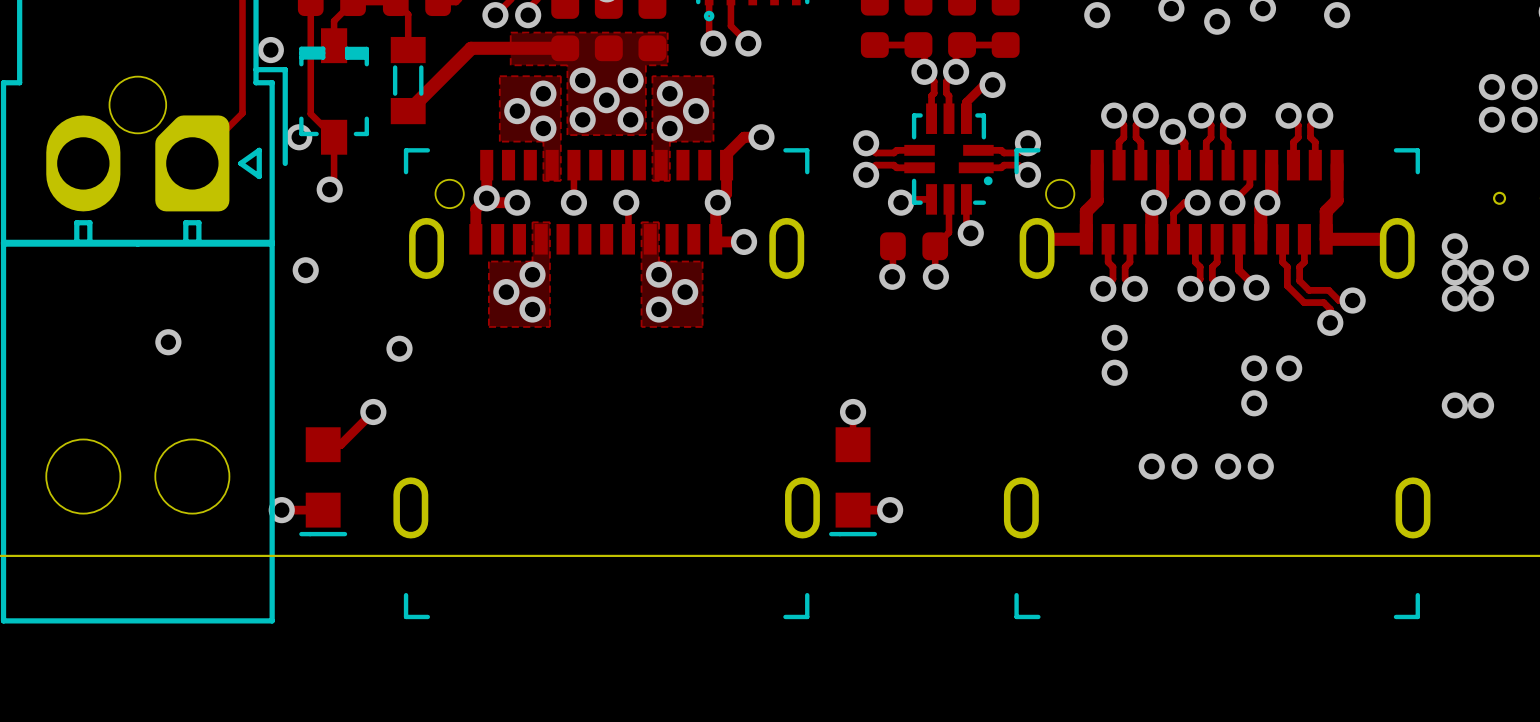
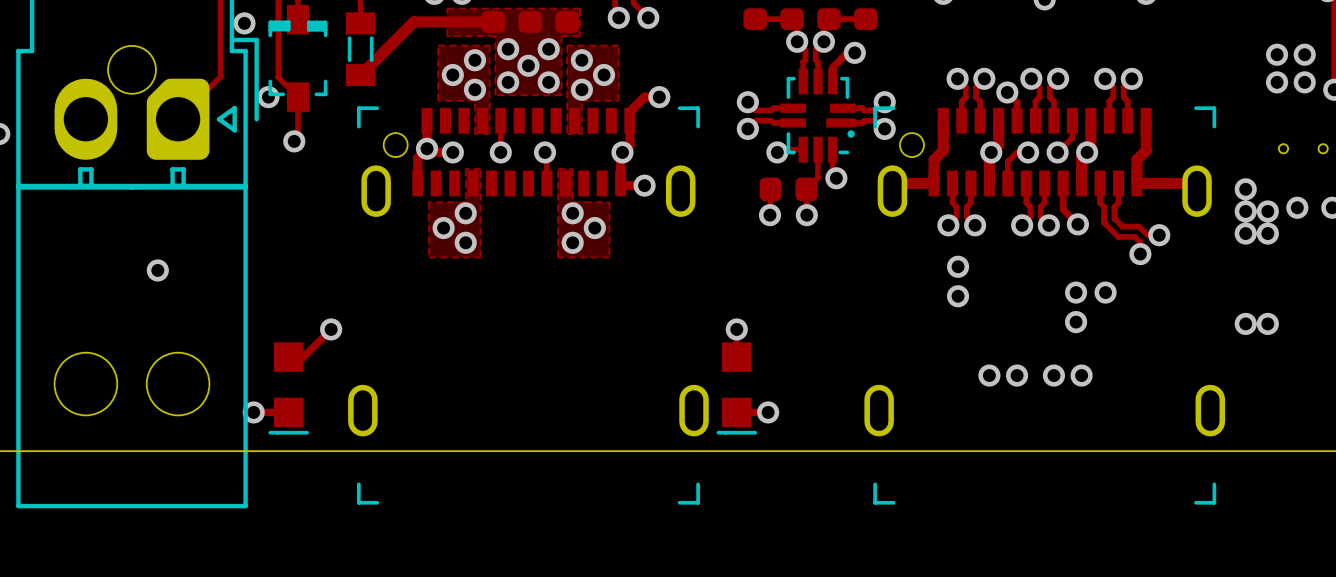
via: (305, 270) -> none
via: (399, 348) -> none

